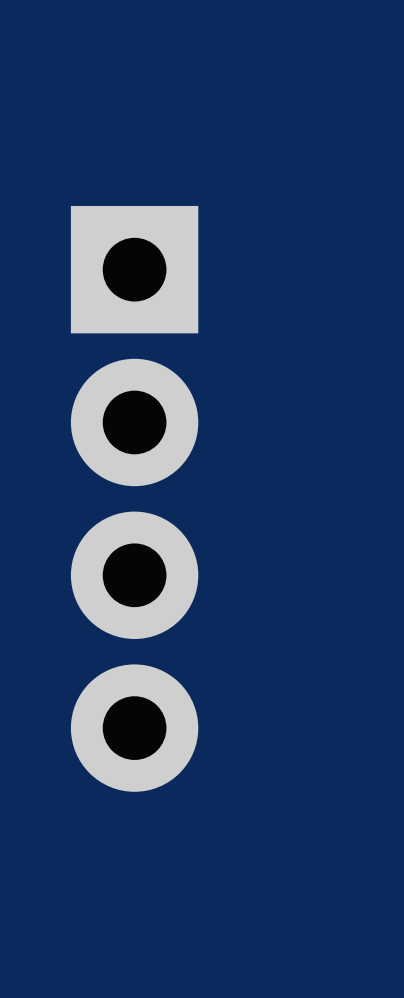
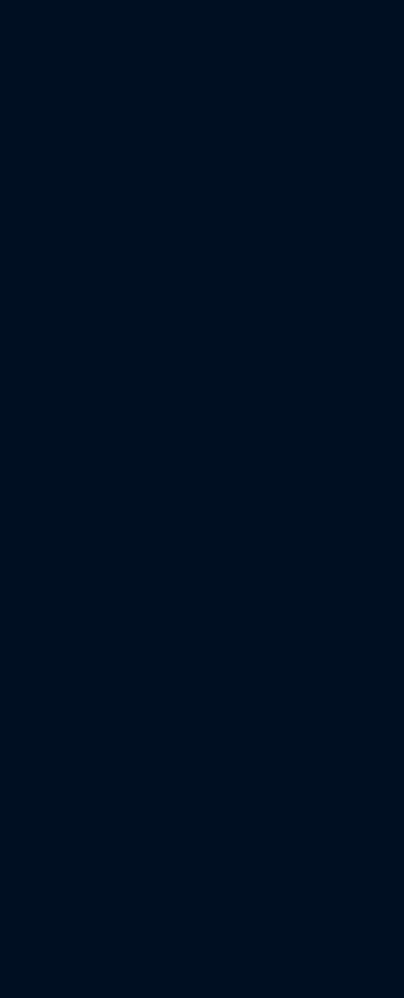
part: (134, 498) -> none

